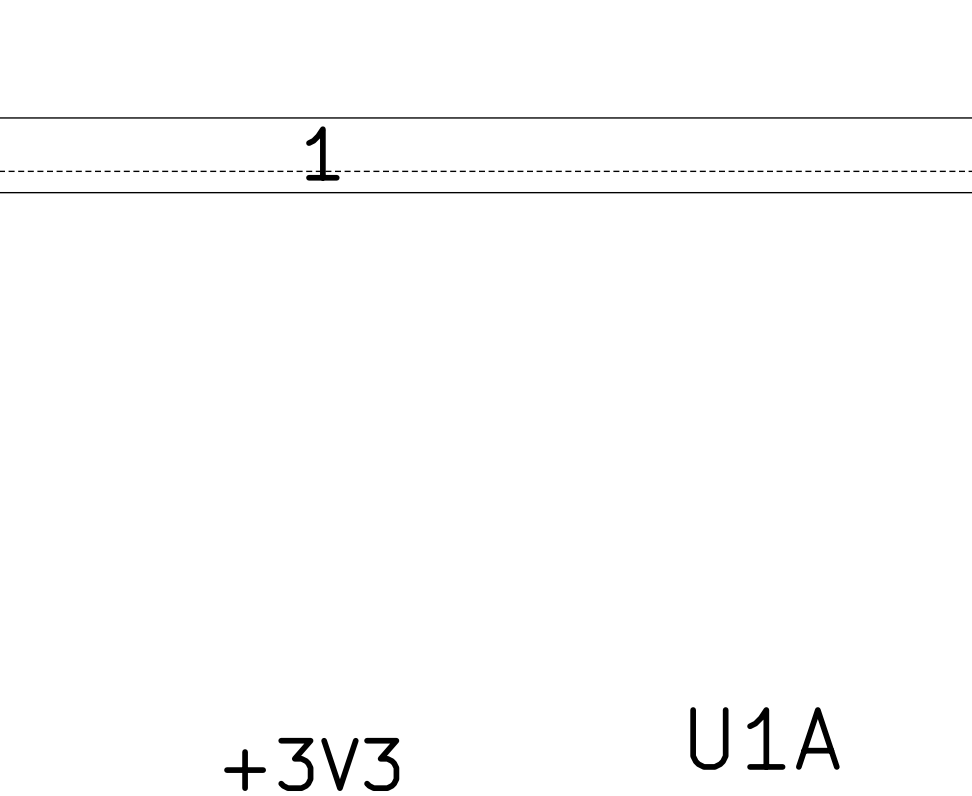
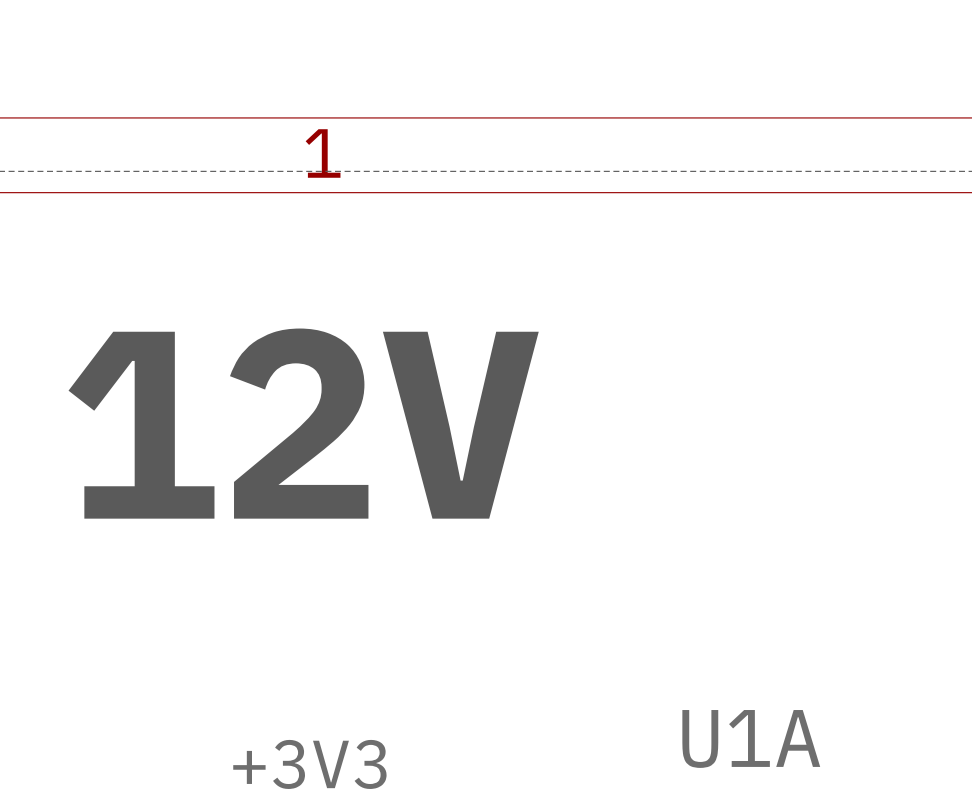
text: none -> 12V (303, 423)

